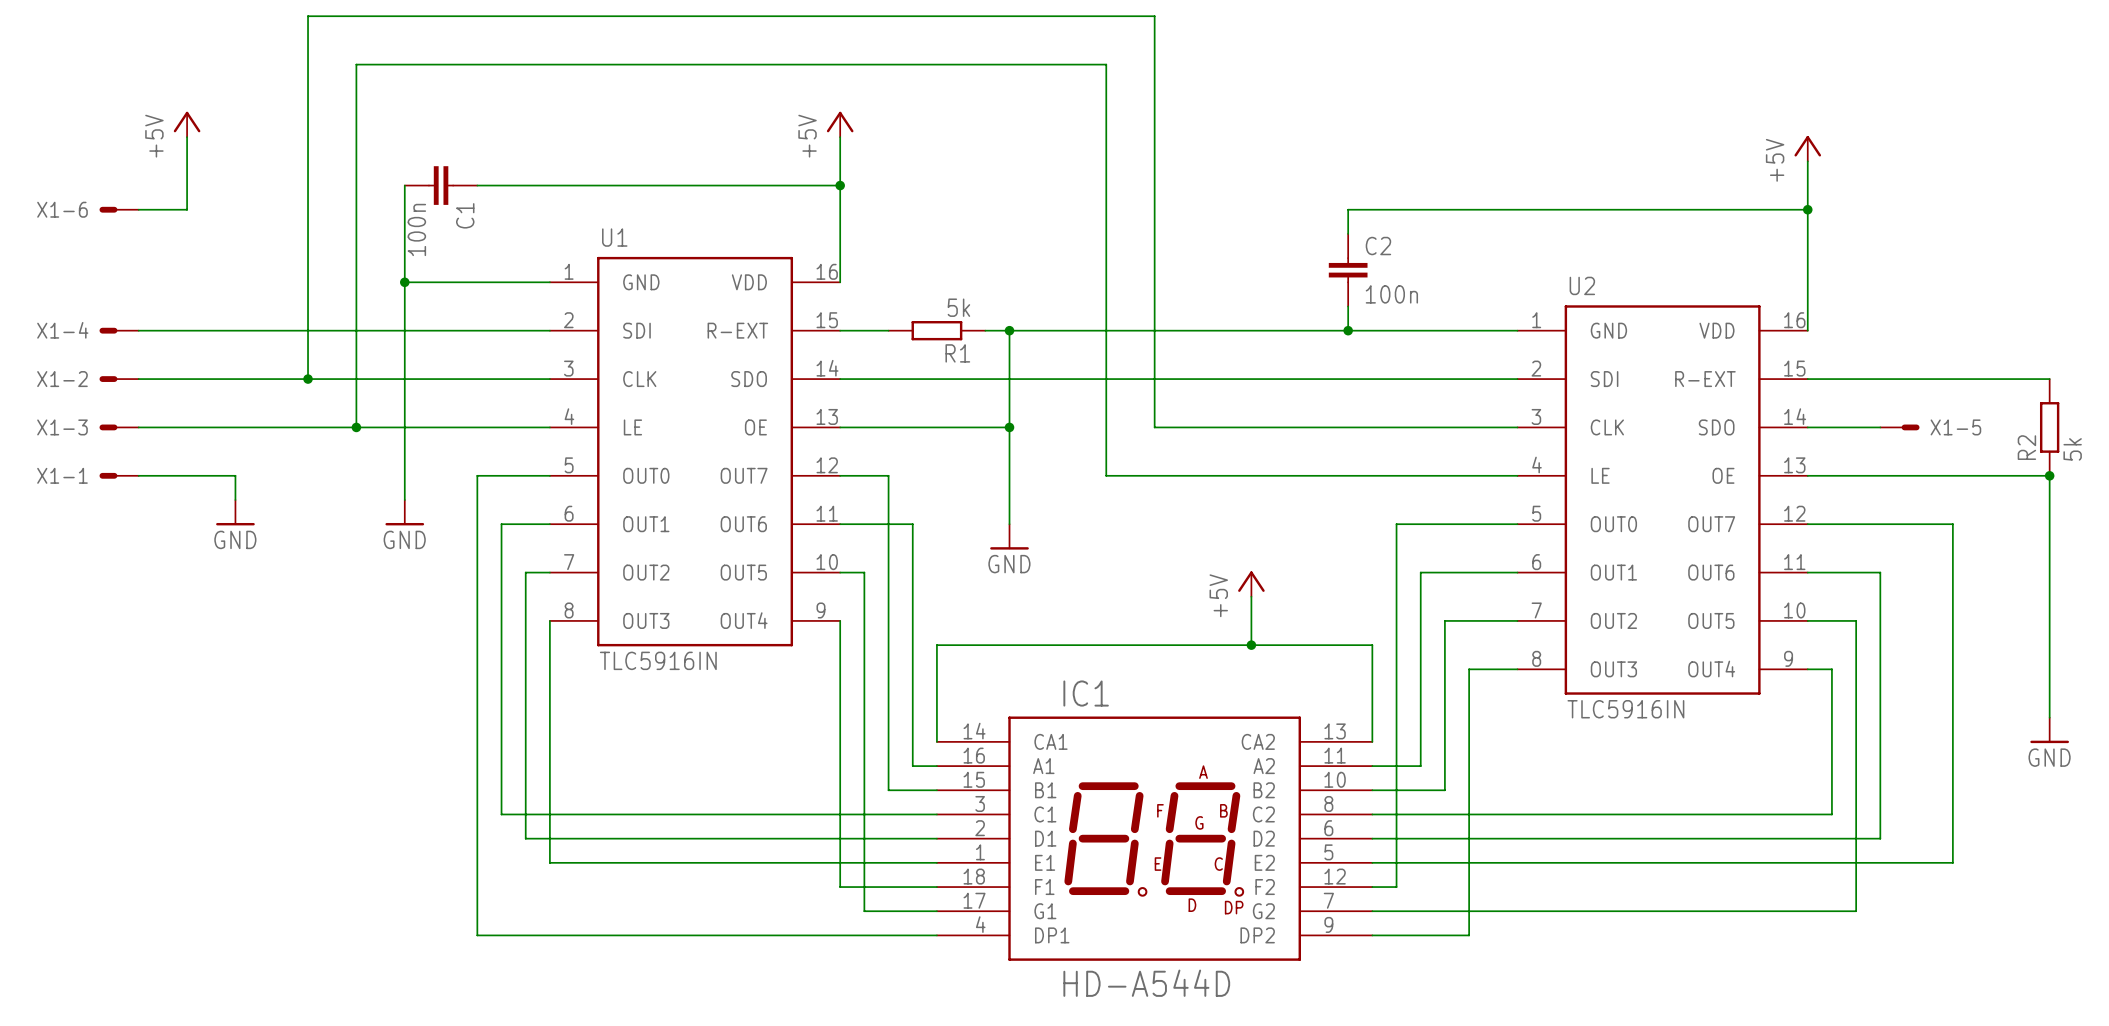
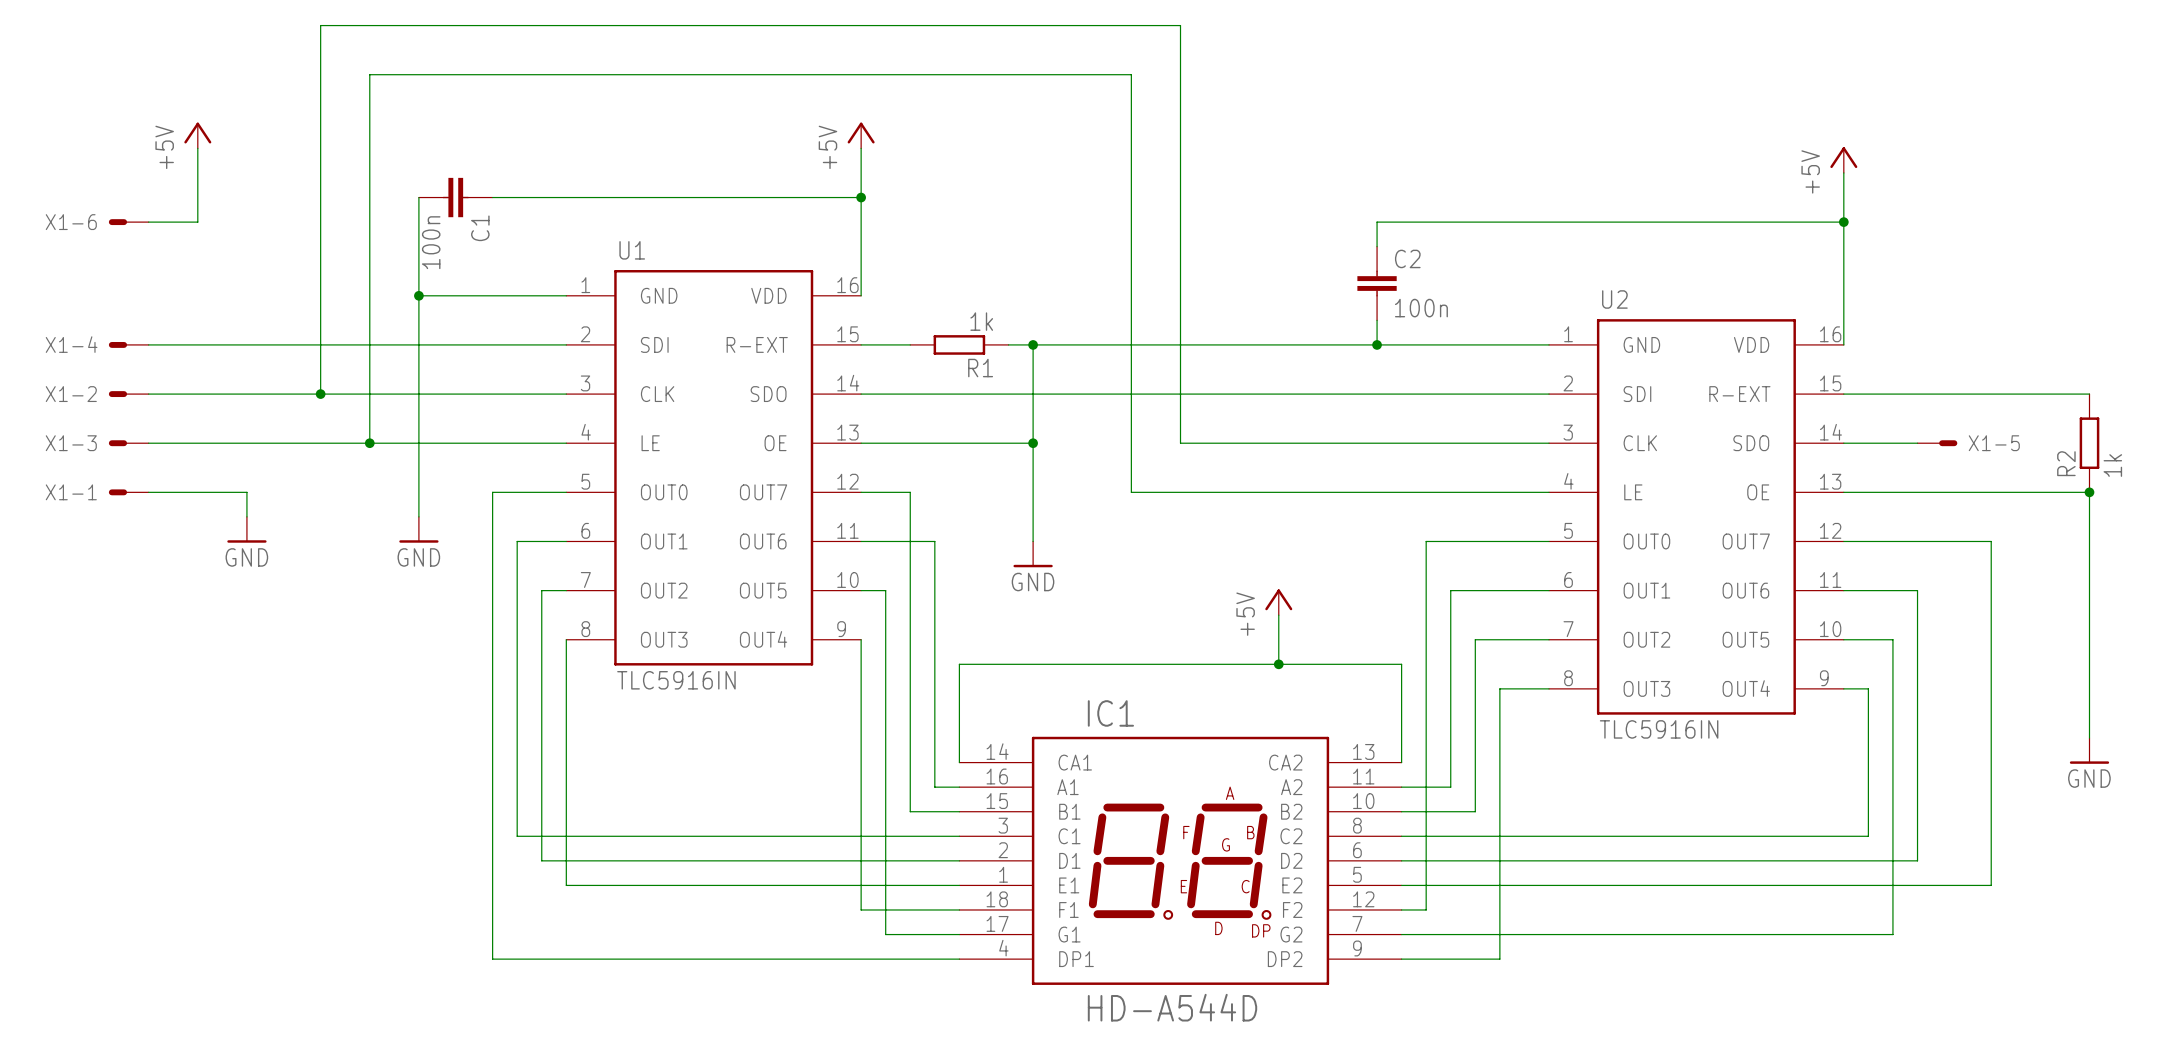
R1 value: 5k (958, 307) -> 1k (981, 321)
R2 value: 5k (2072, 449) -> 1k (2112, 465)

